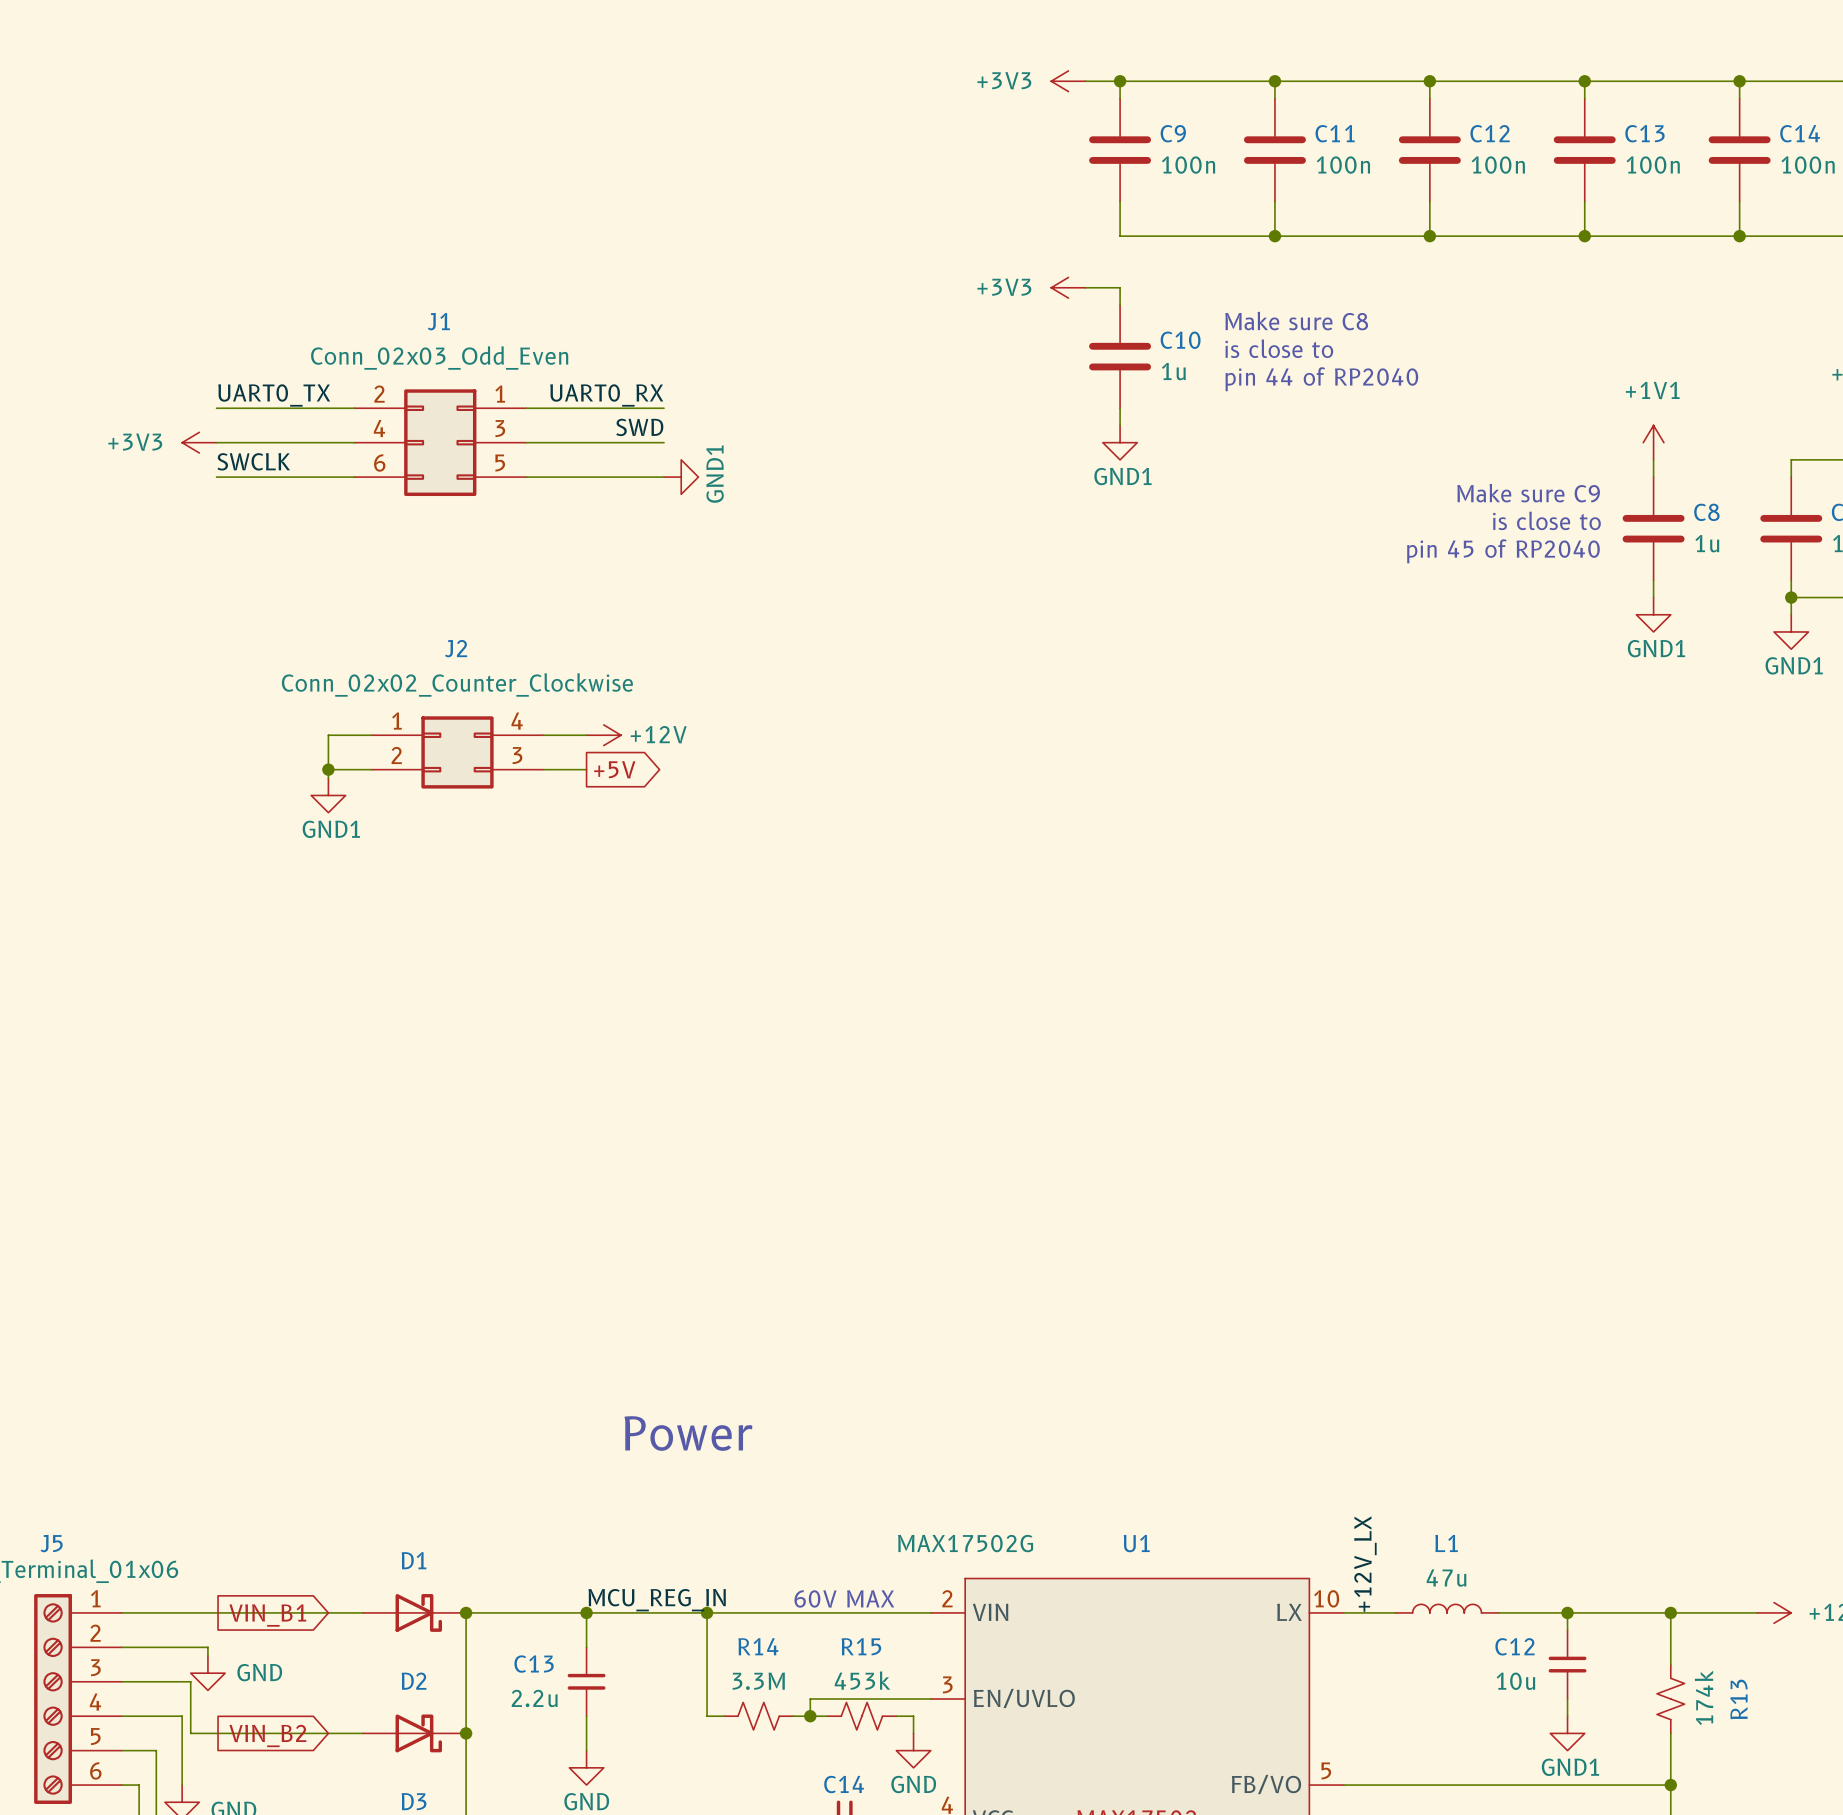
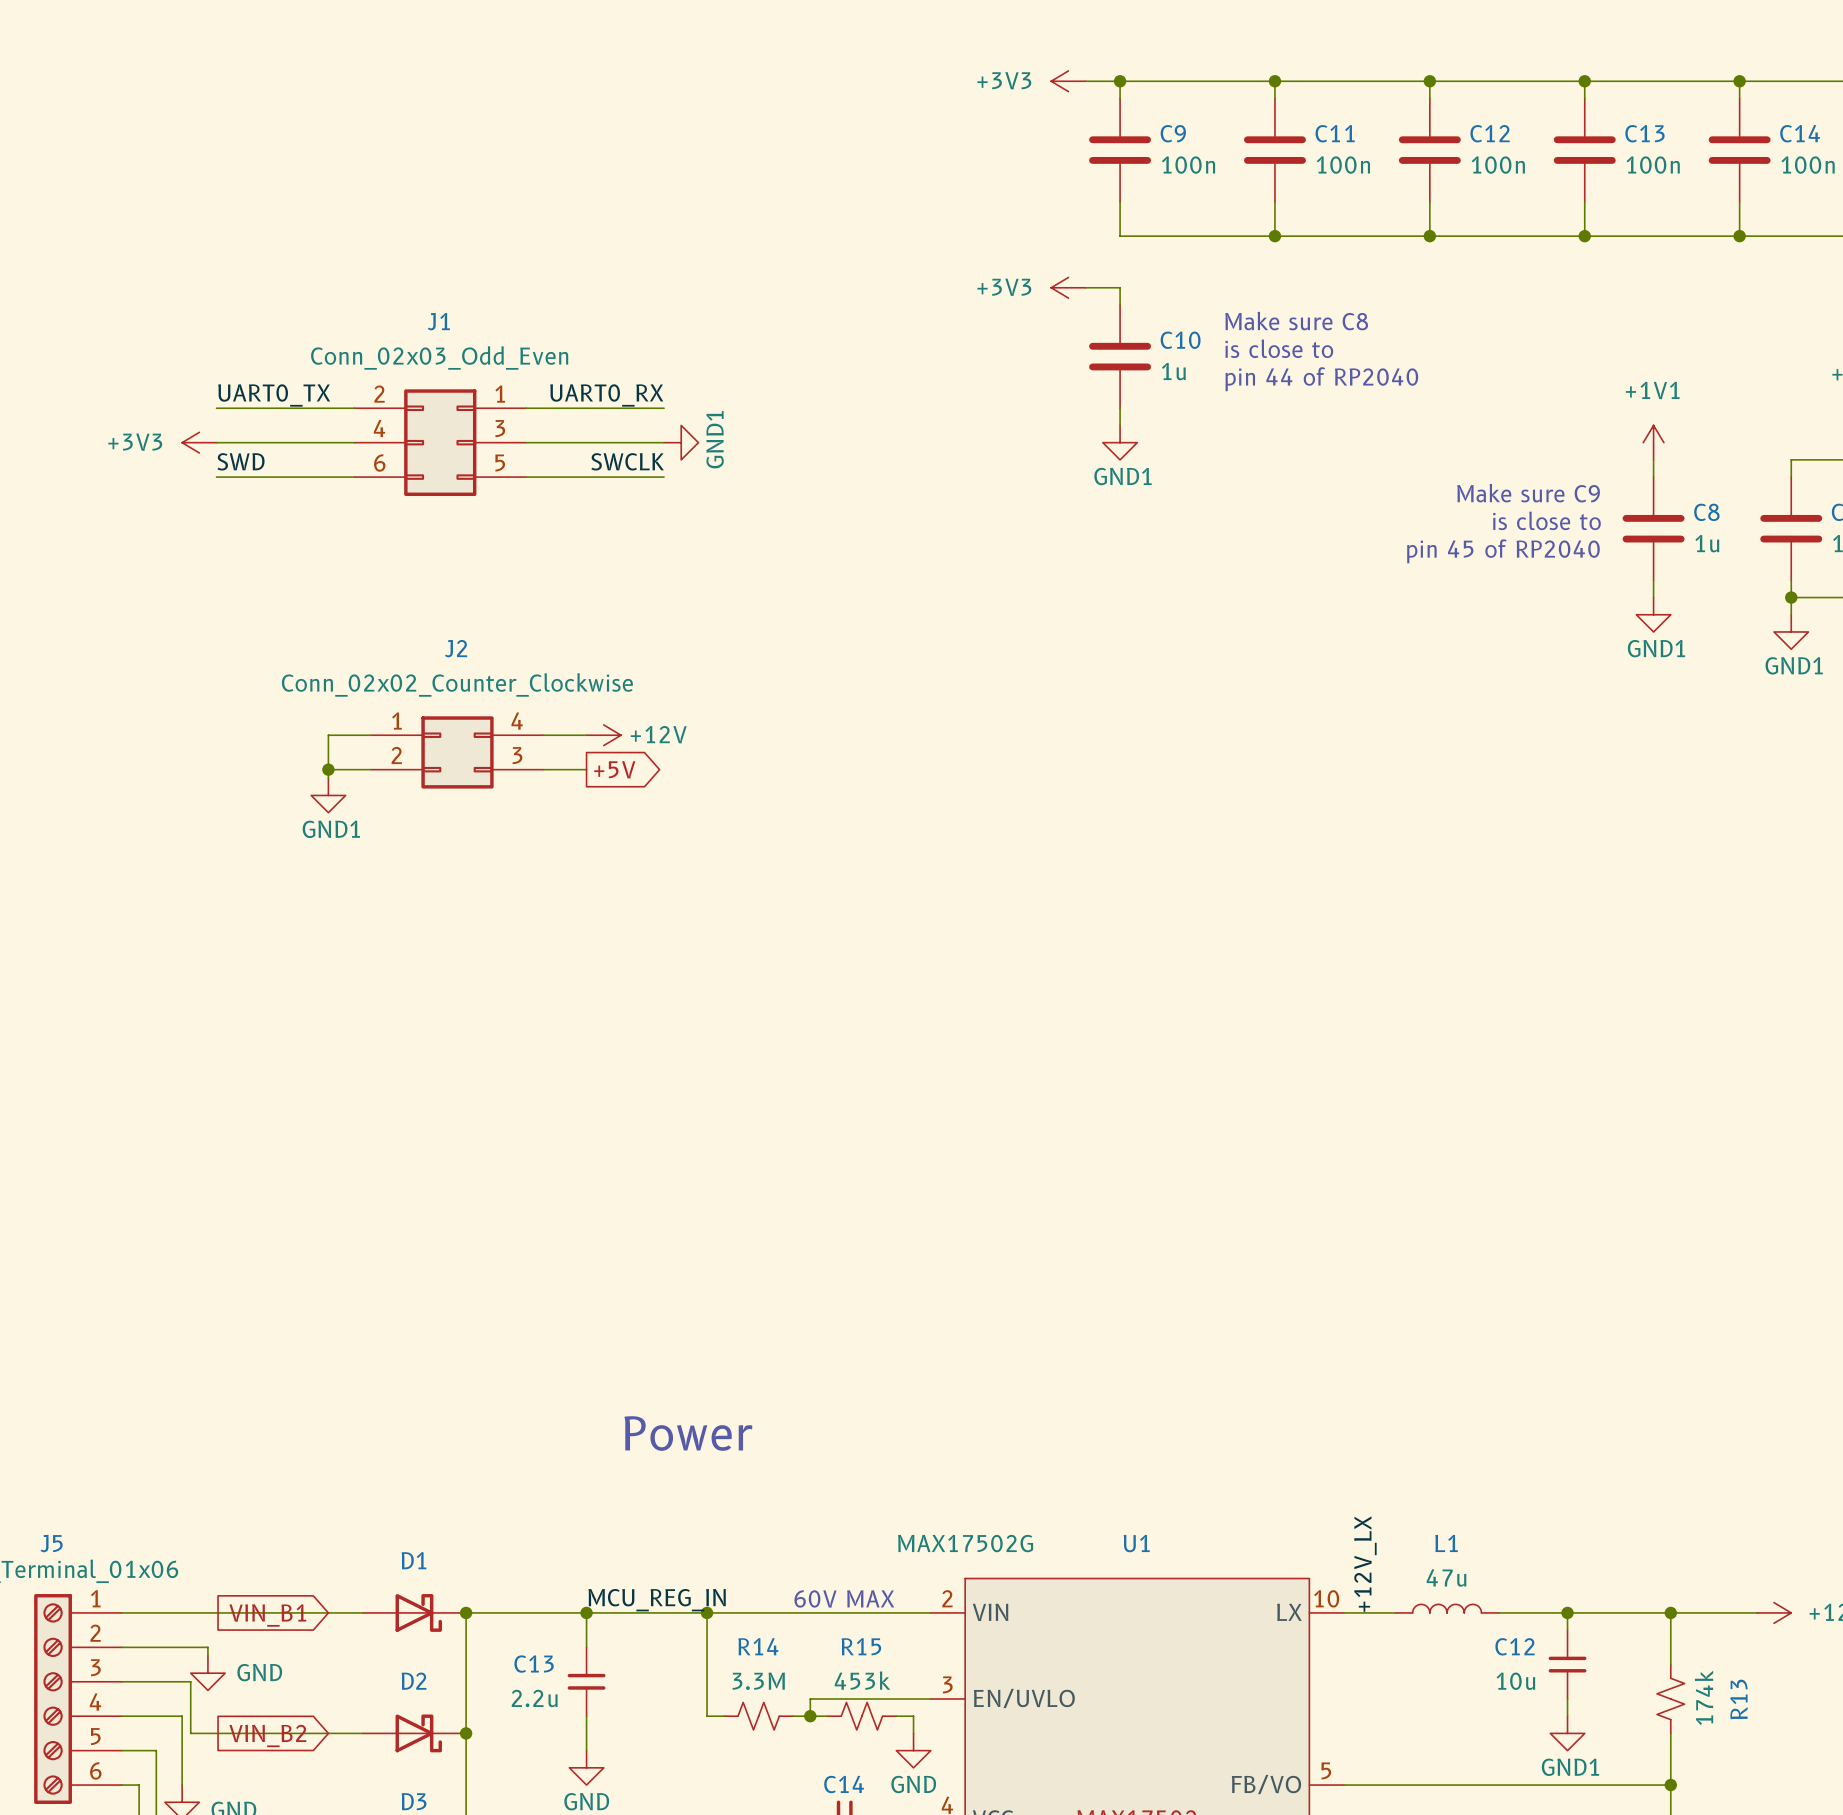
label: SWD (639, 427) -> none
label: SWCLK (253, 461) -> SWD (241, 461)
label: none -> SWCLK (627, 461)
power symbol position: GND1 (681, 477) -> GND1 (681, 442)

